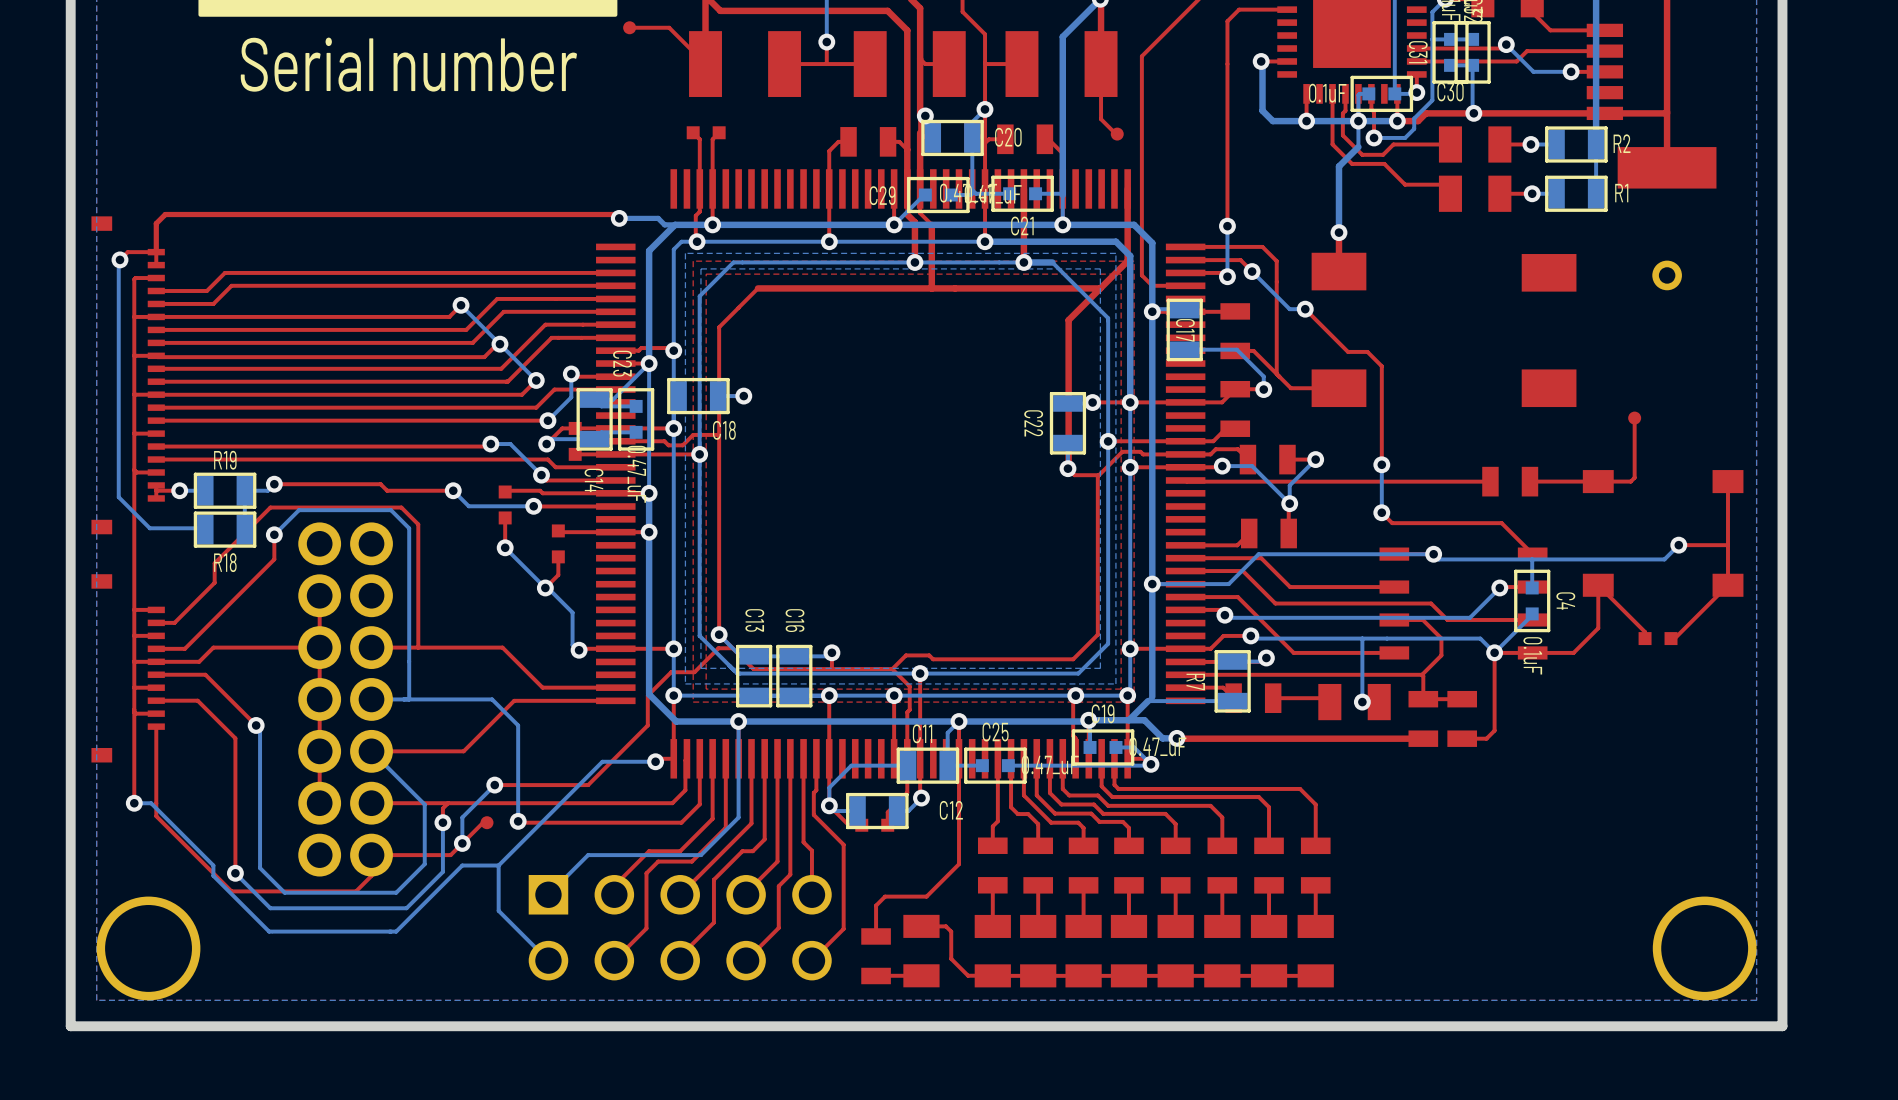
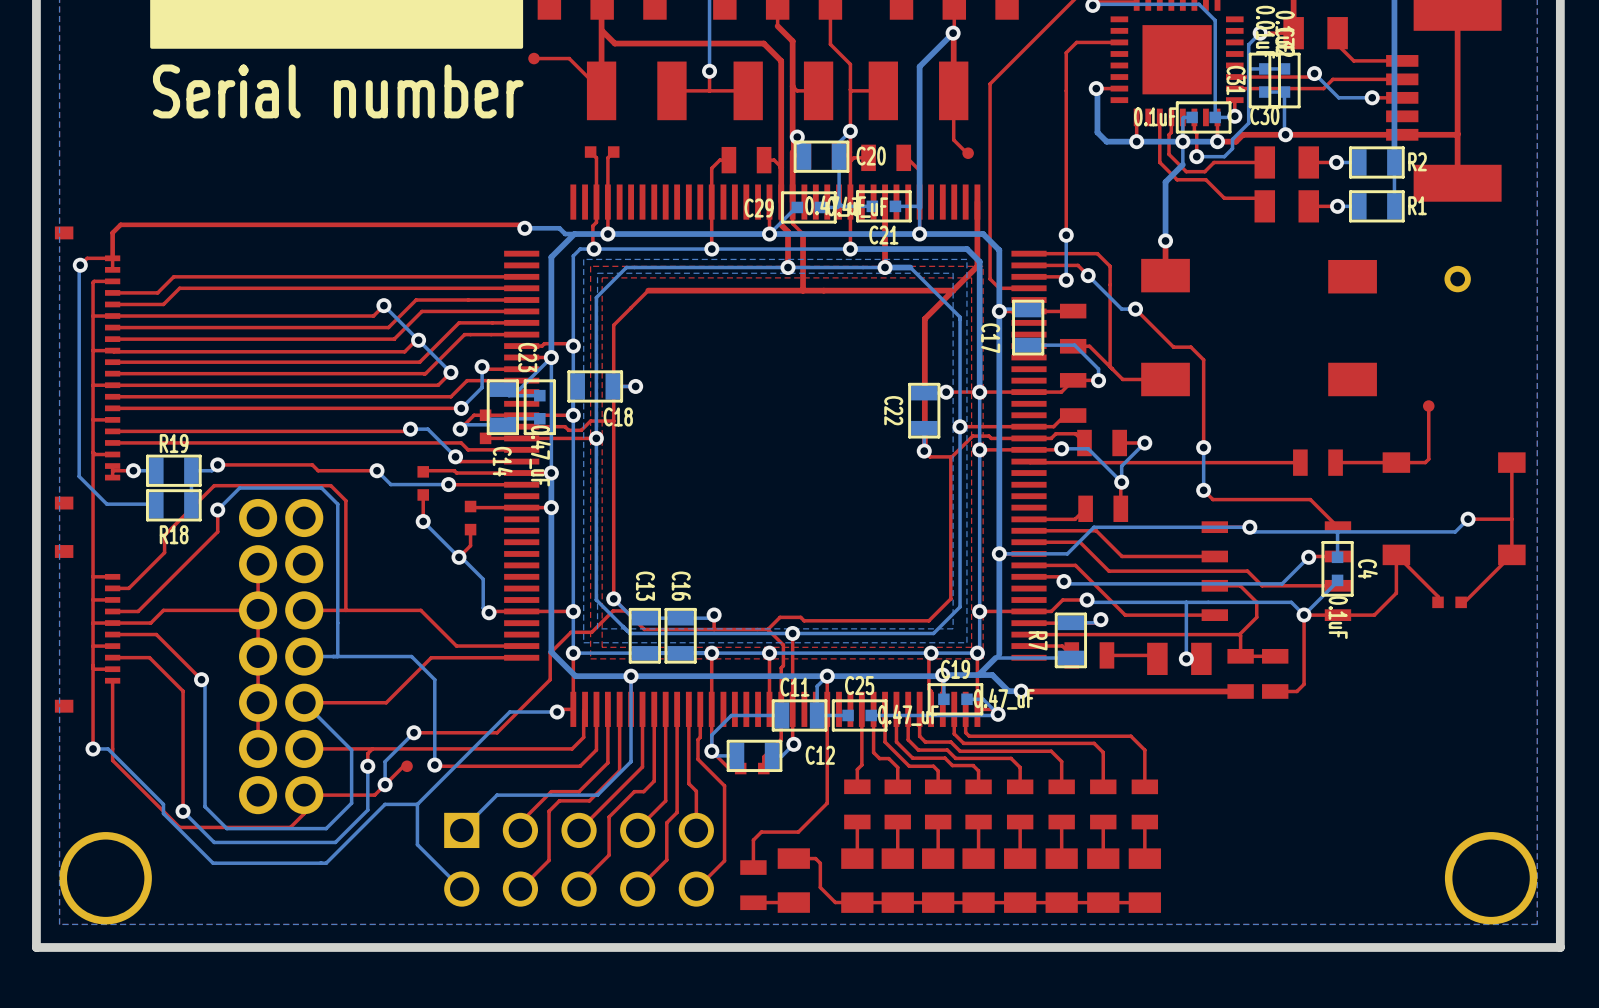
C17 name position: C17 (1185, 330) -> C17 (990, 338)

